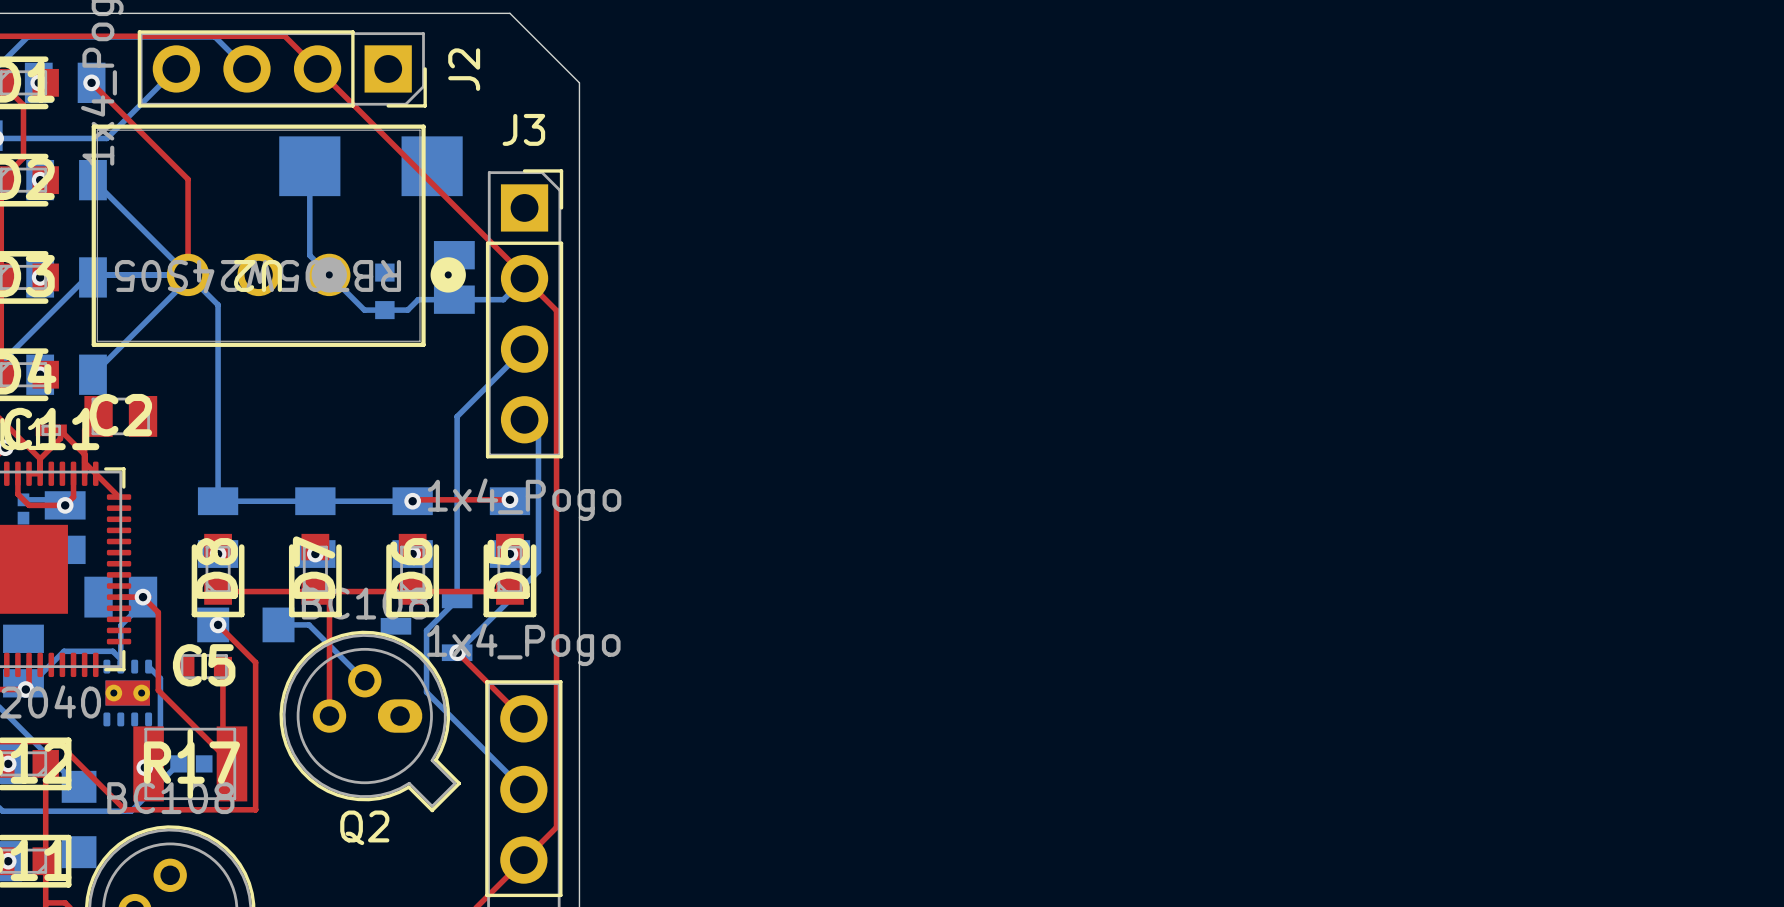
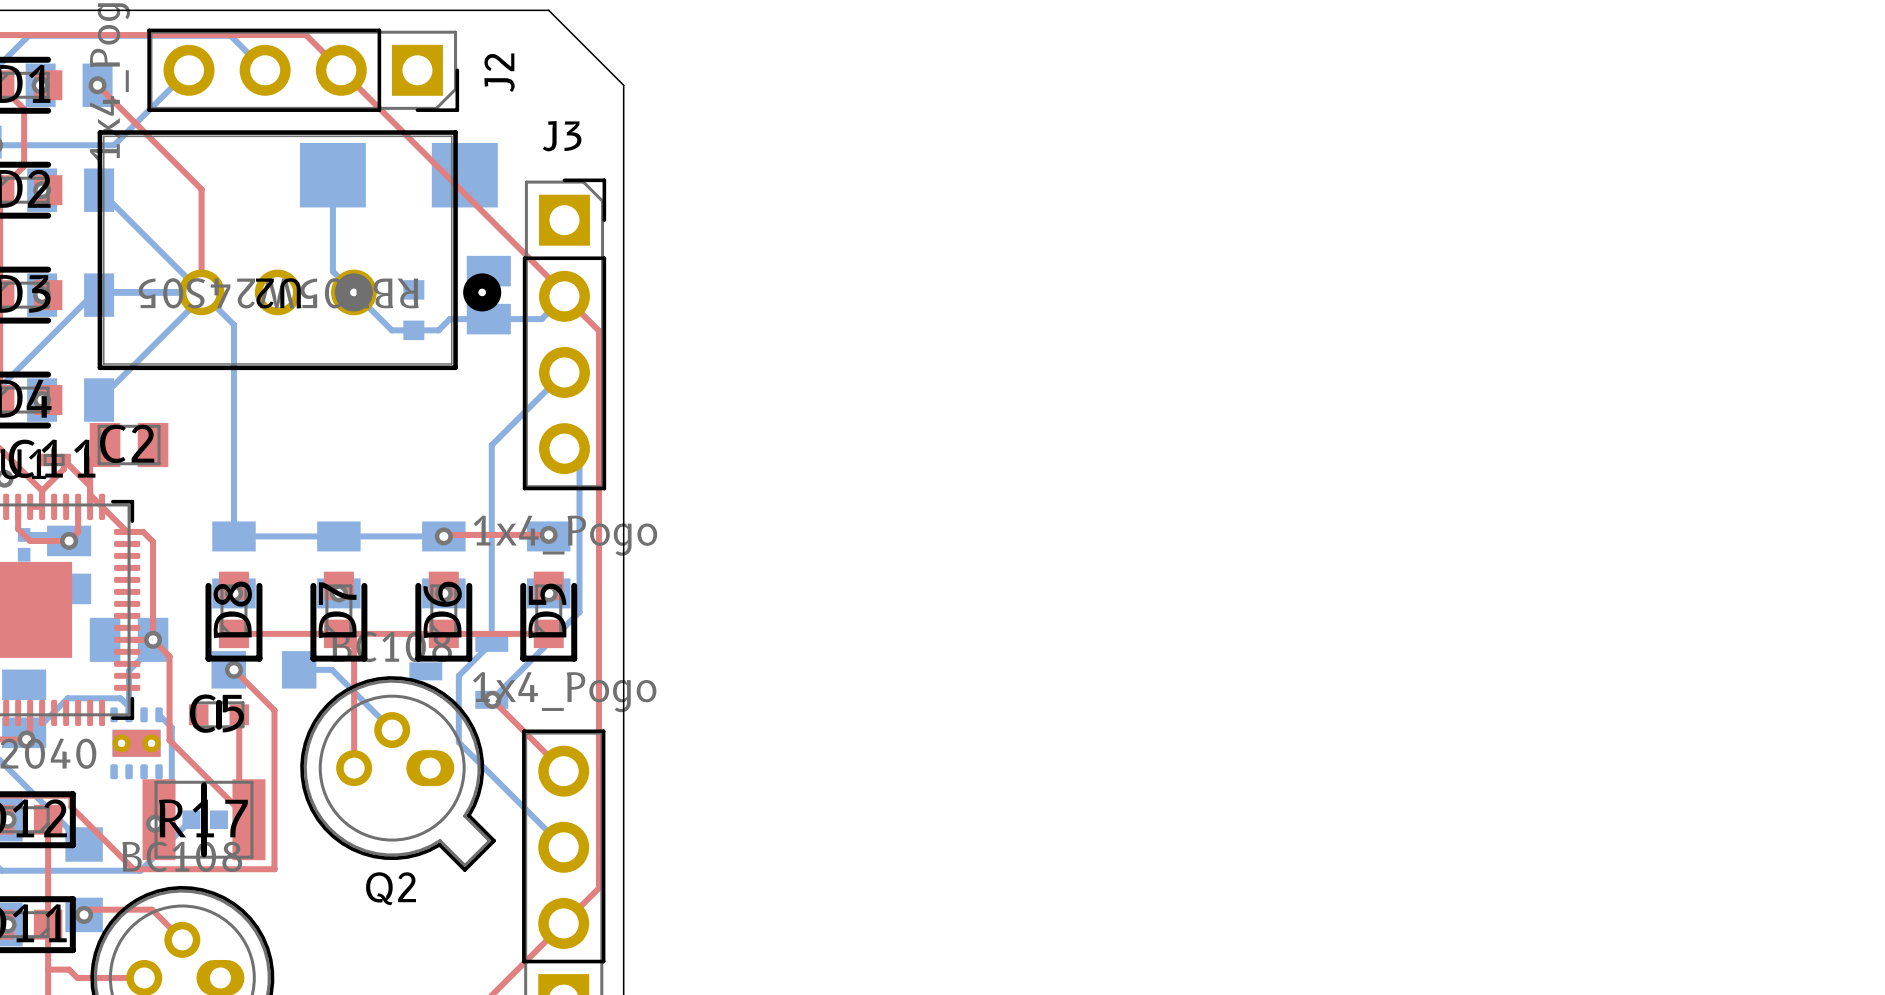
top track: none -> (127, 531) (143, 531) (153, 541) (153, 639)
top track: none -> (84, 914) (84, 909) (152, 909) (182, 939)
via: none -> (84, 914)

